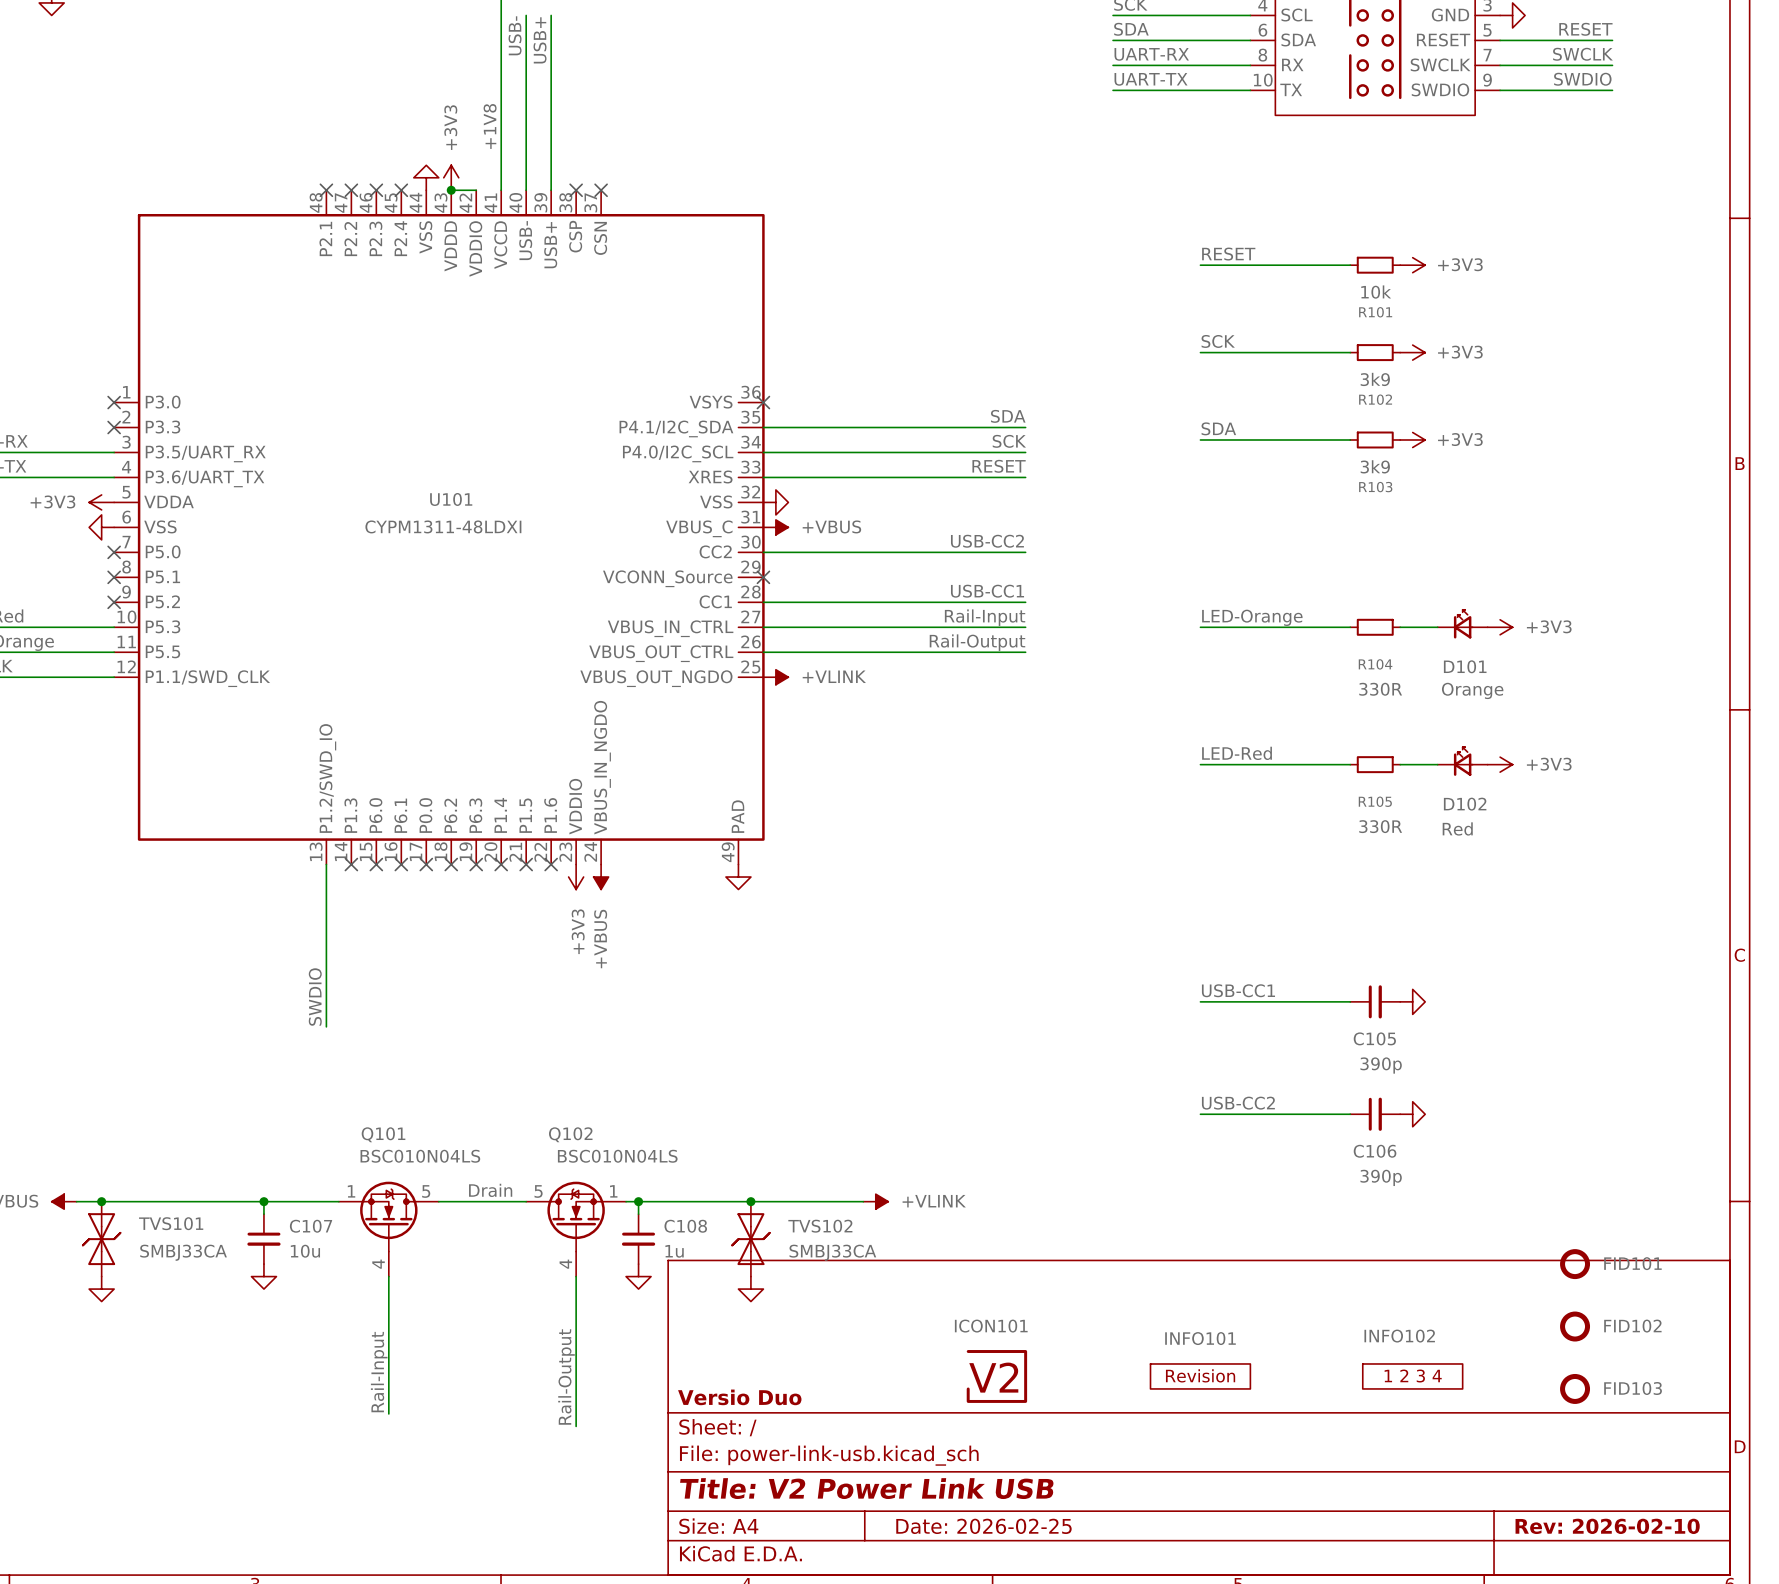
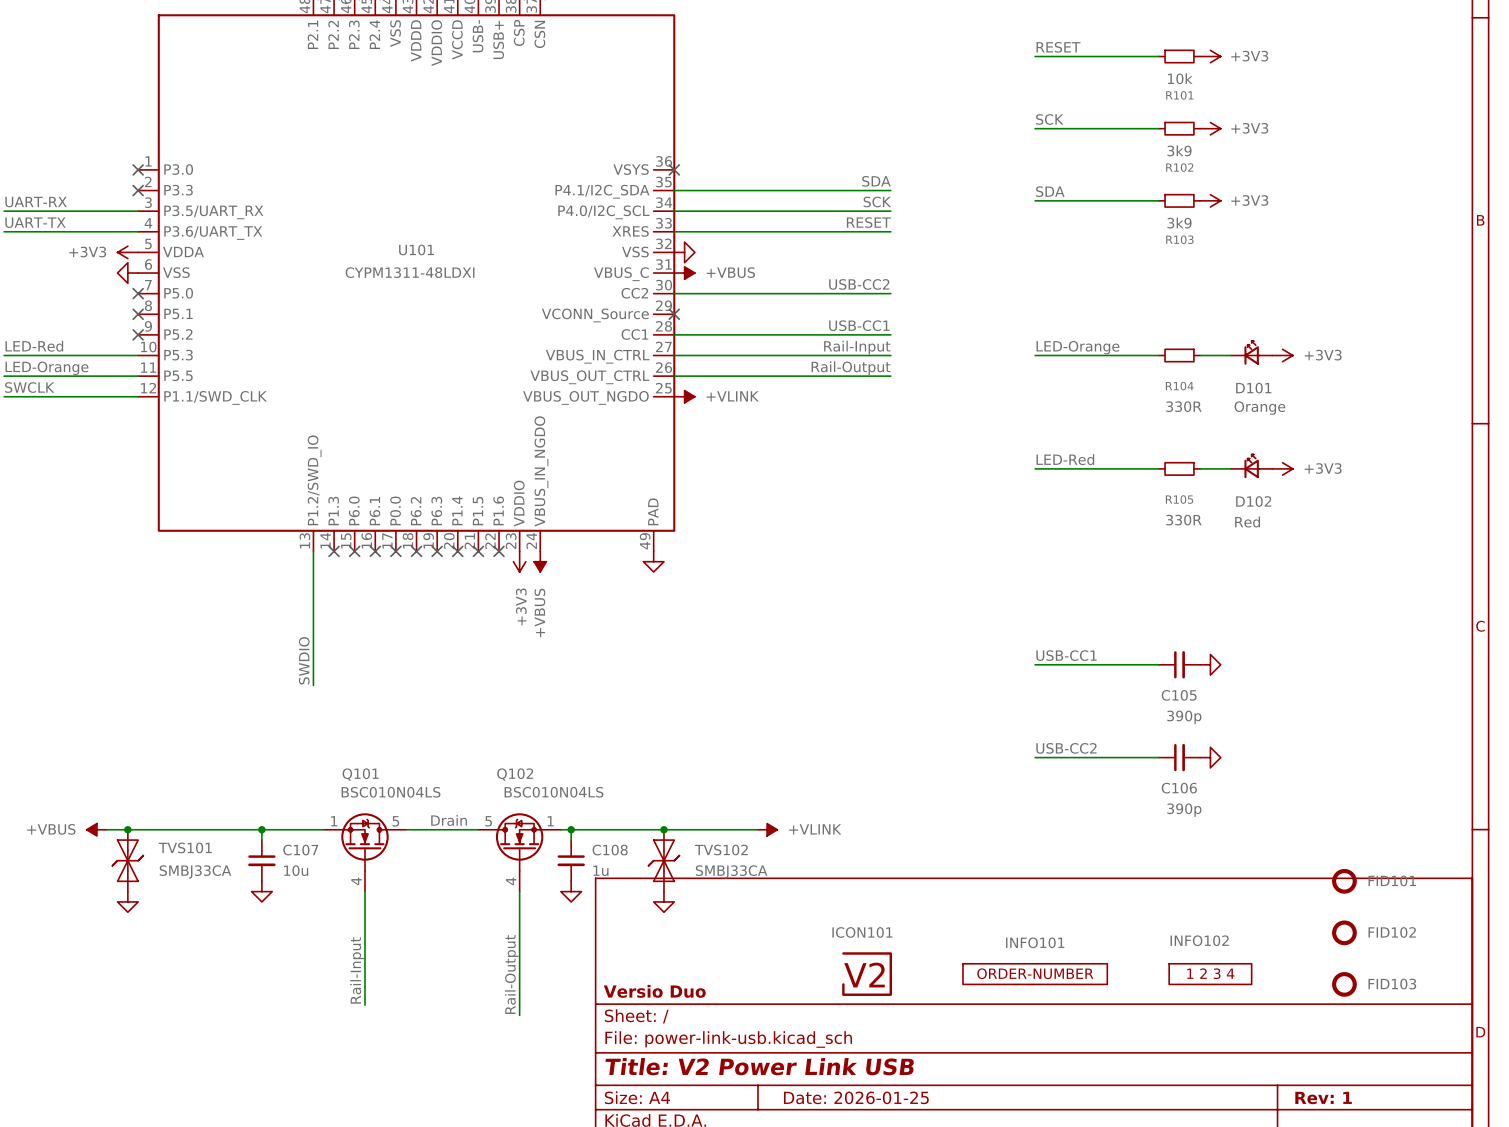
INFO101 symbol: [1150, 1363, 1251, 1389] -> [962, 963, 1108, 985]
title block: Date: 2026-02-25 (983, 1526) -> Date: 2026-01-25 (856, 1097)
title block: Rev: 2026-02-10 (1607, 1526) -> Rev: 1 (1323, 1097)

